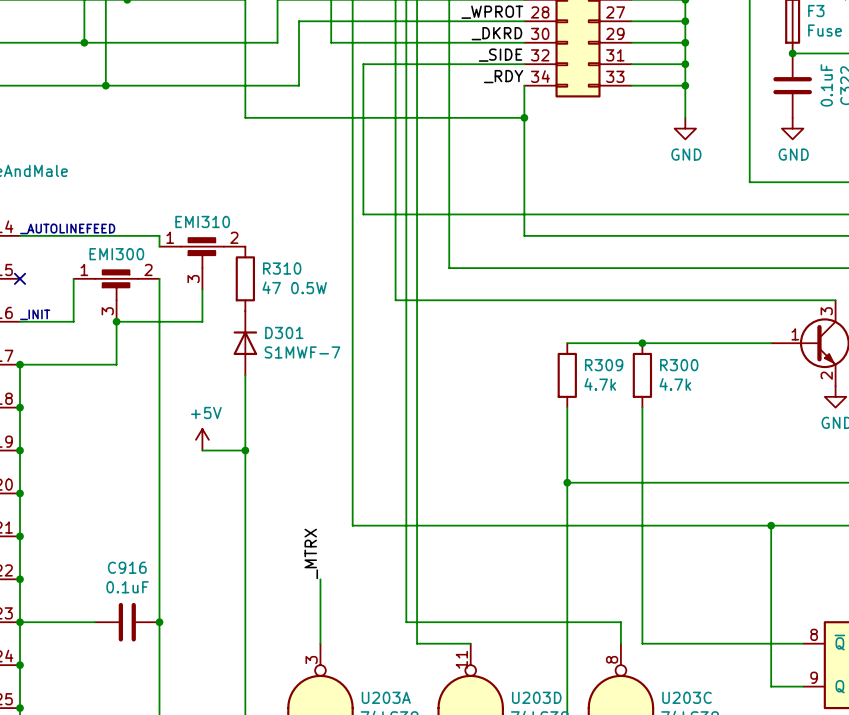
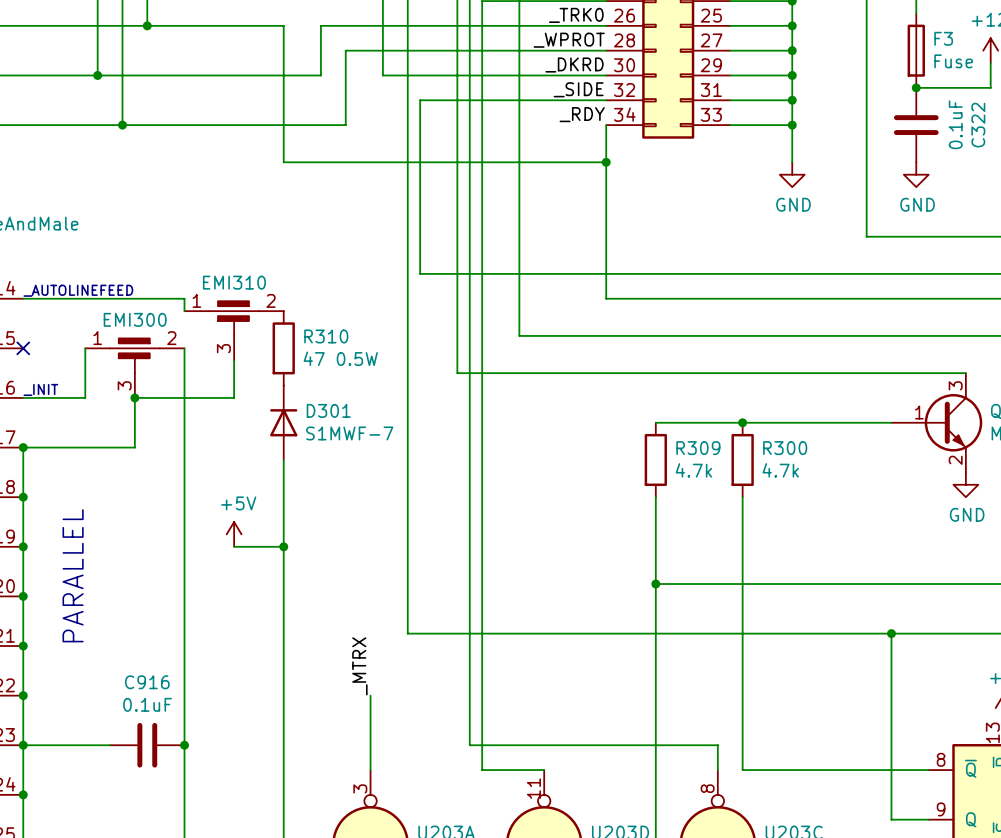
text: none -> PARALLEL (73, 575)

